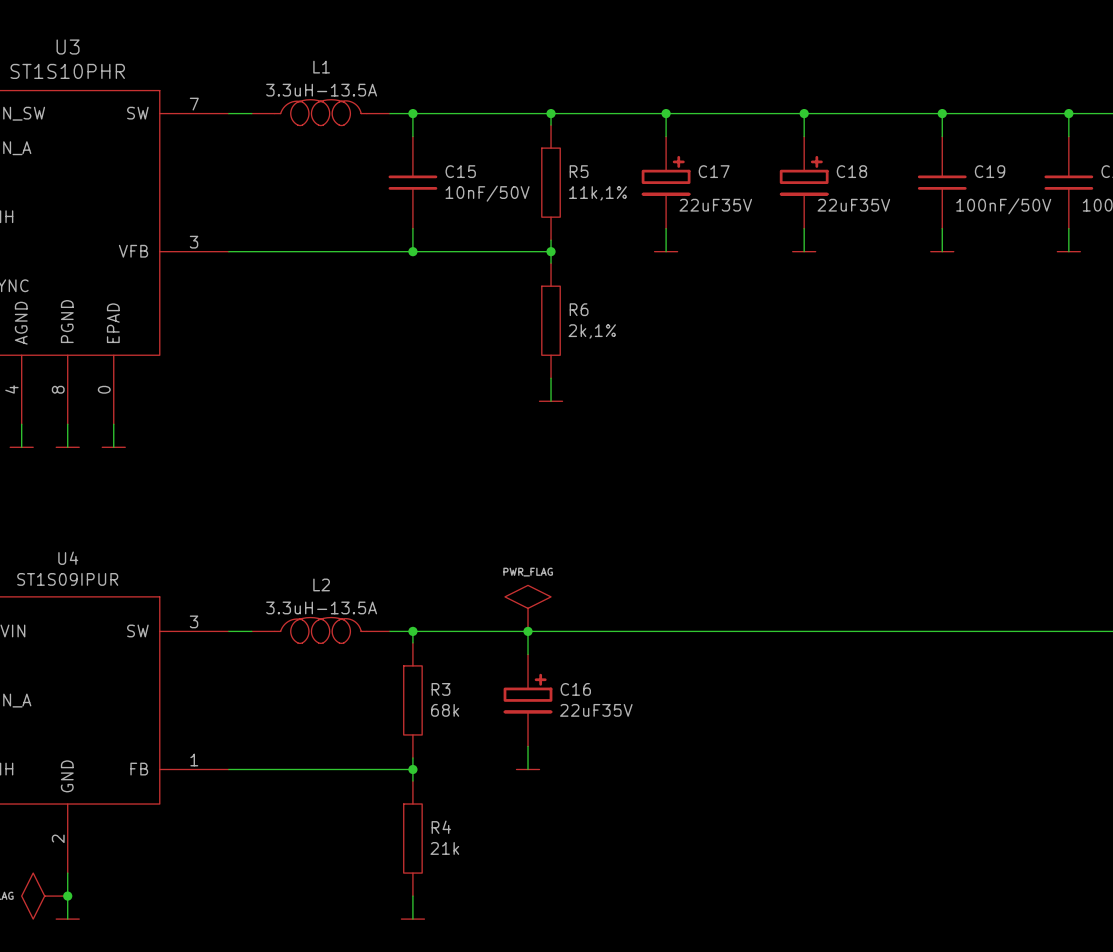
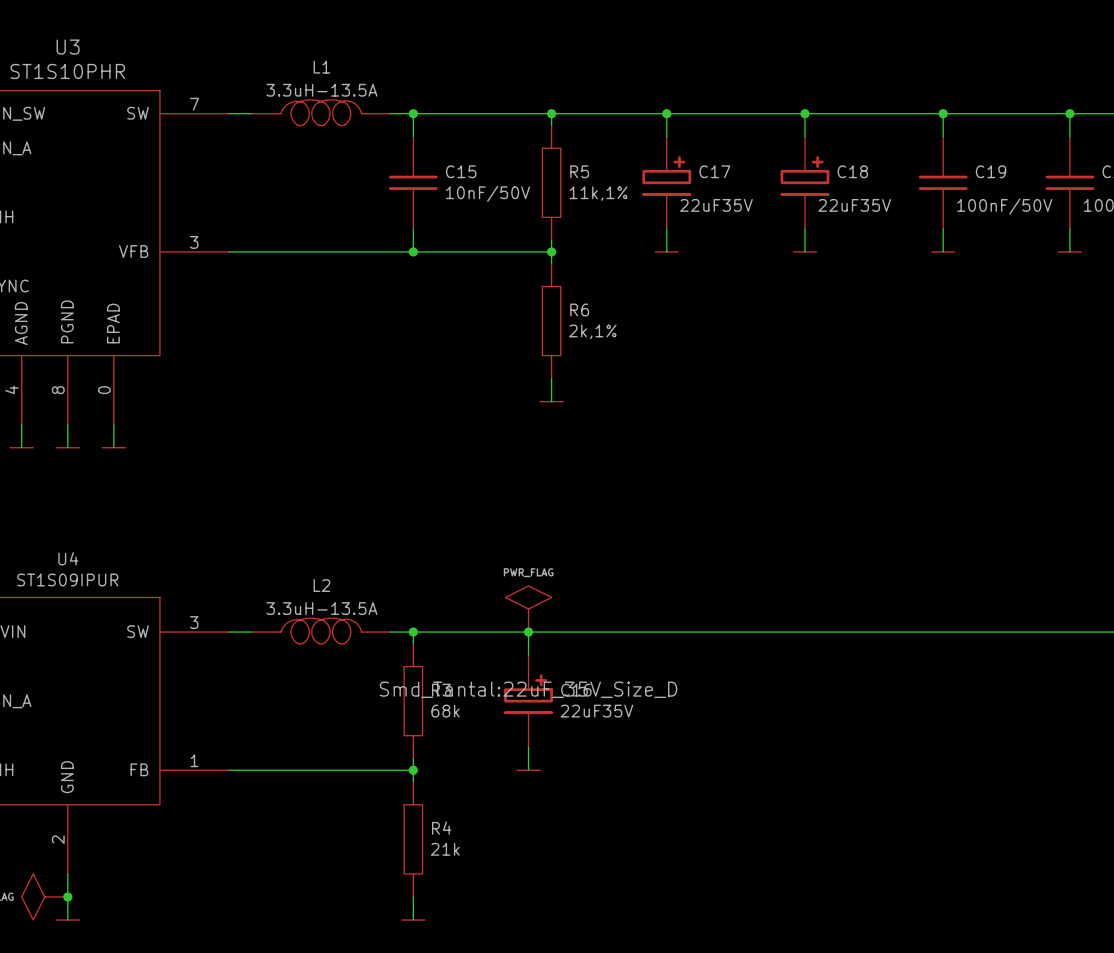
C16 symbol: [503, 654, 553, 747] -> [504, 655, 553, 748]
C16 text: none -> Smd_Tantal:22uF_35V_Size_D (528, 689)

